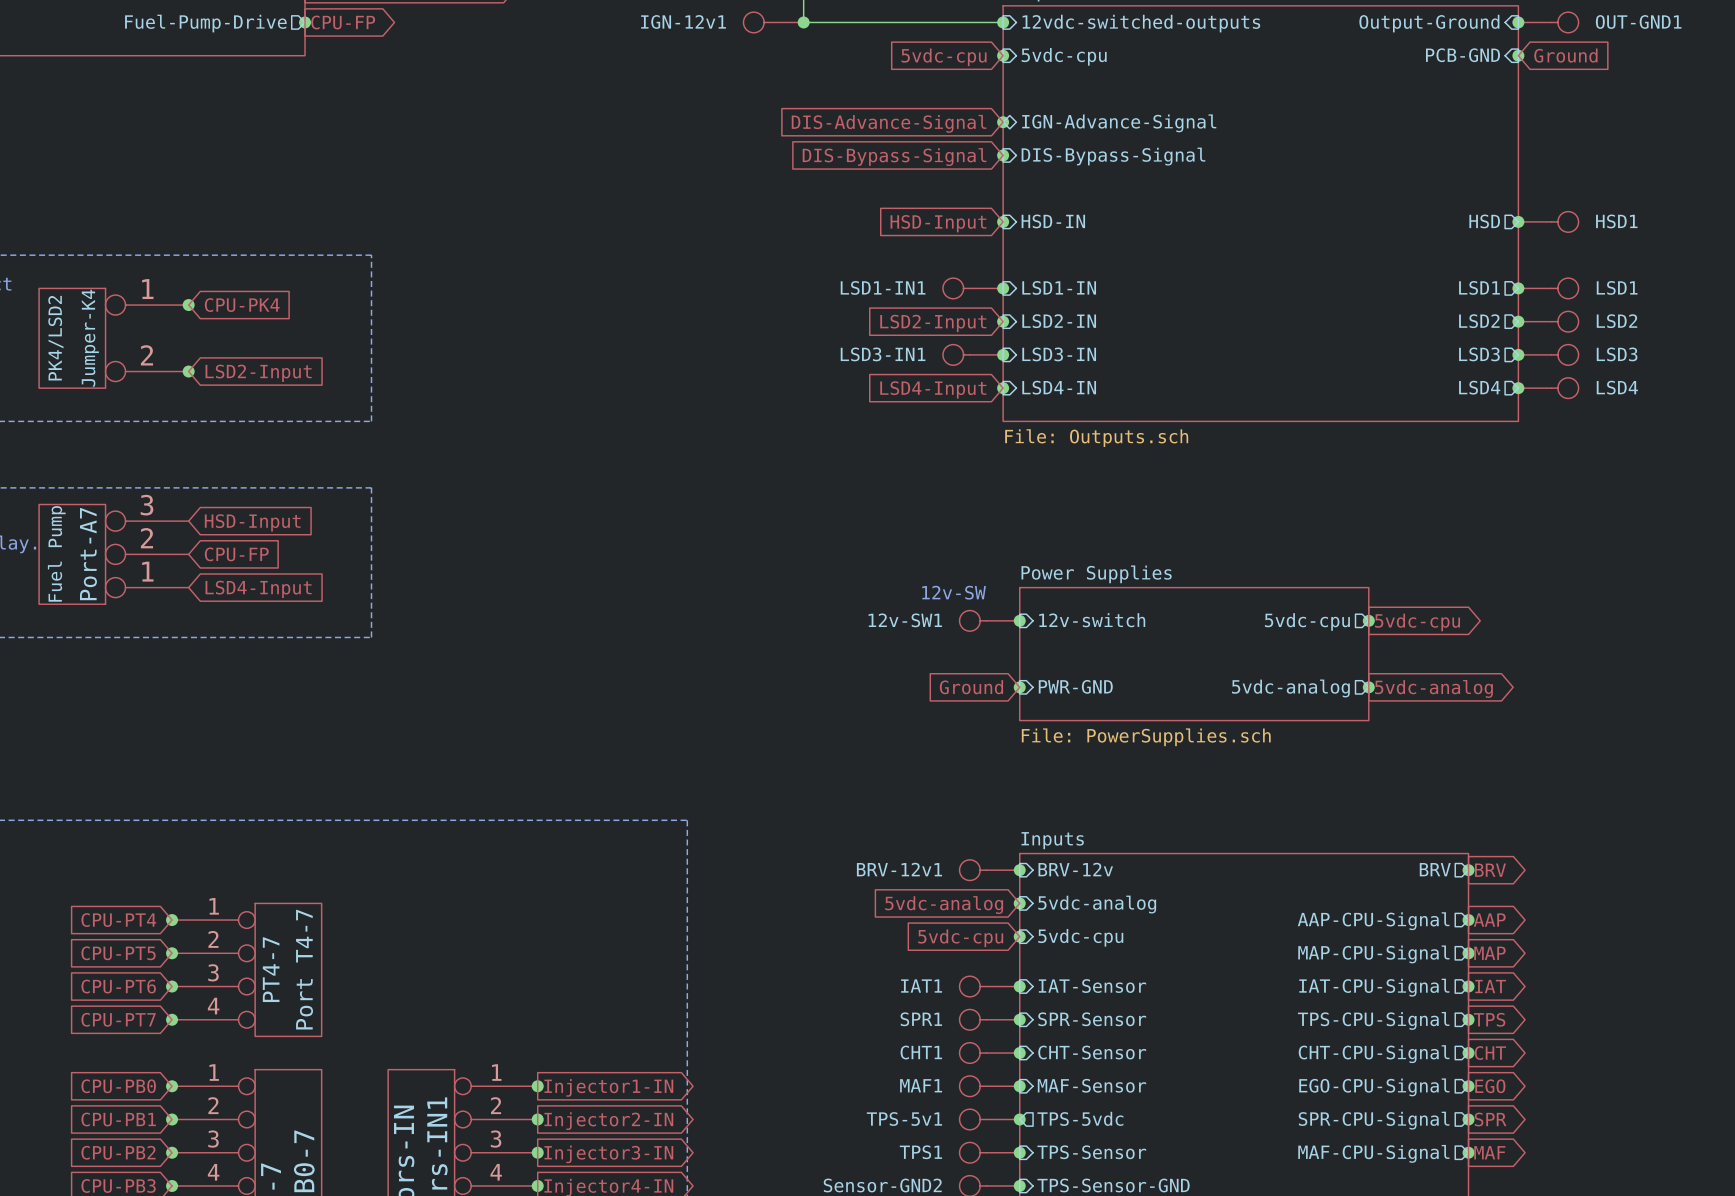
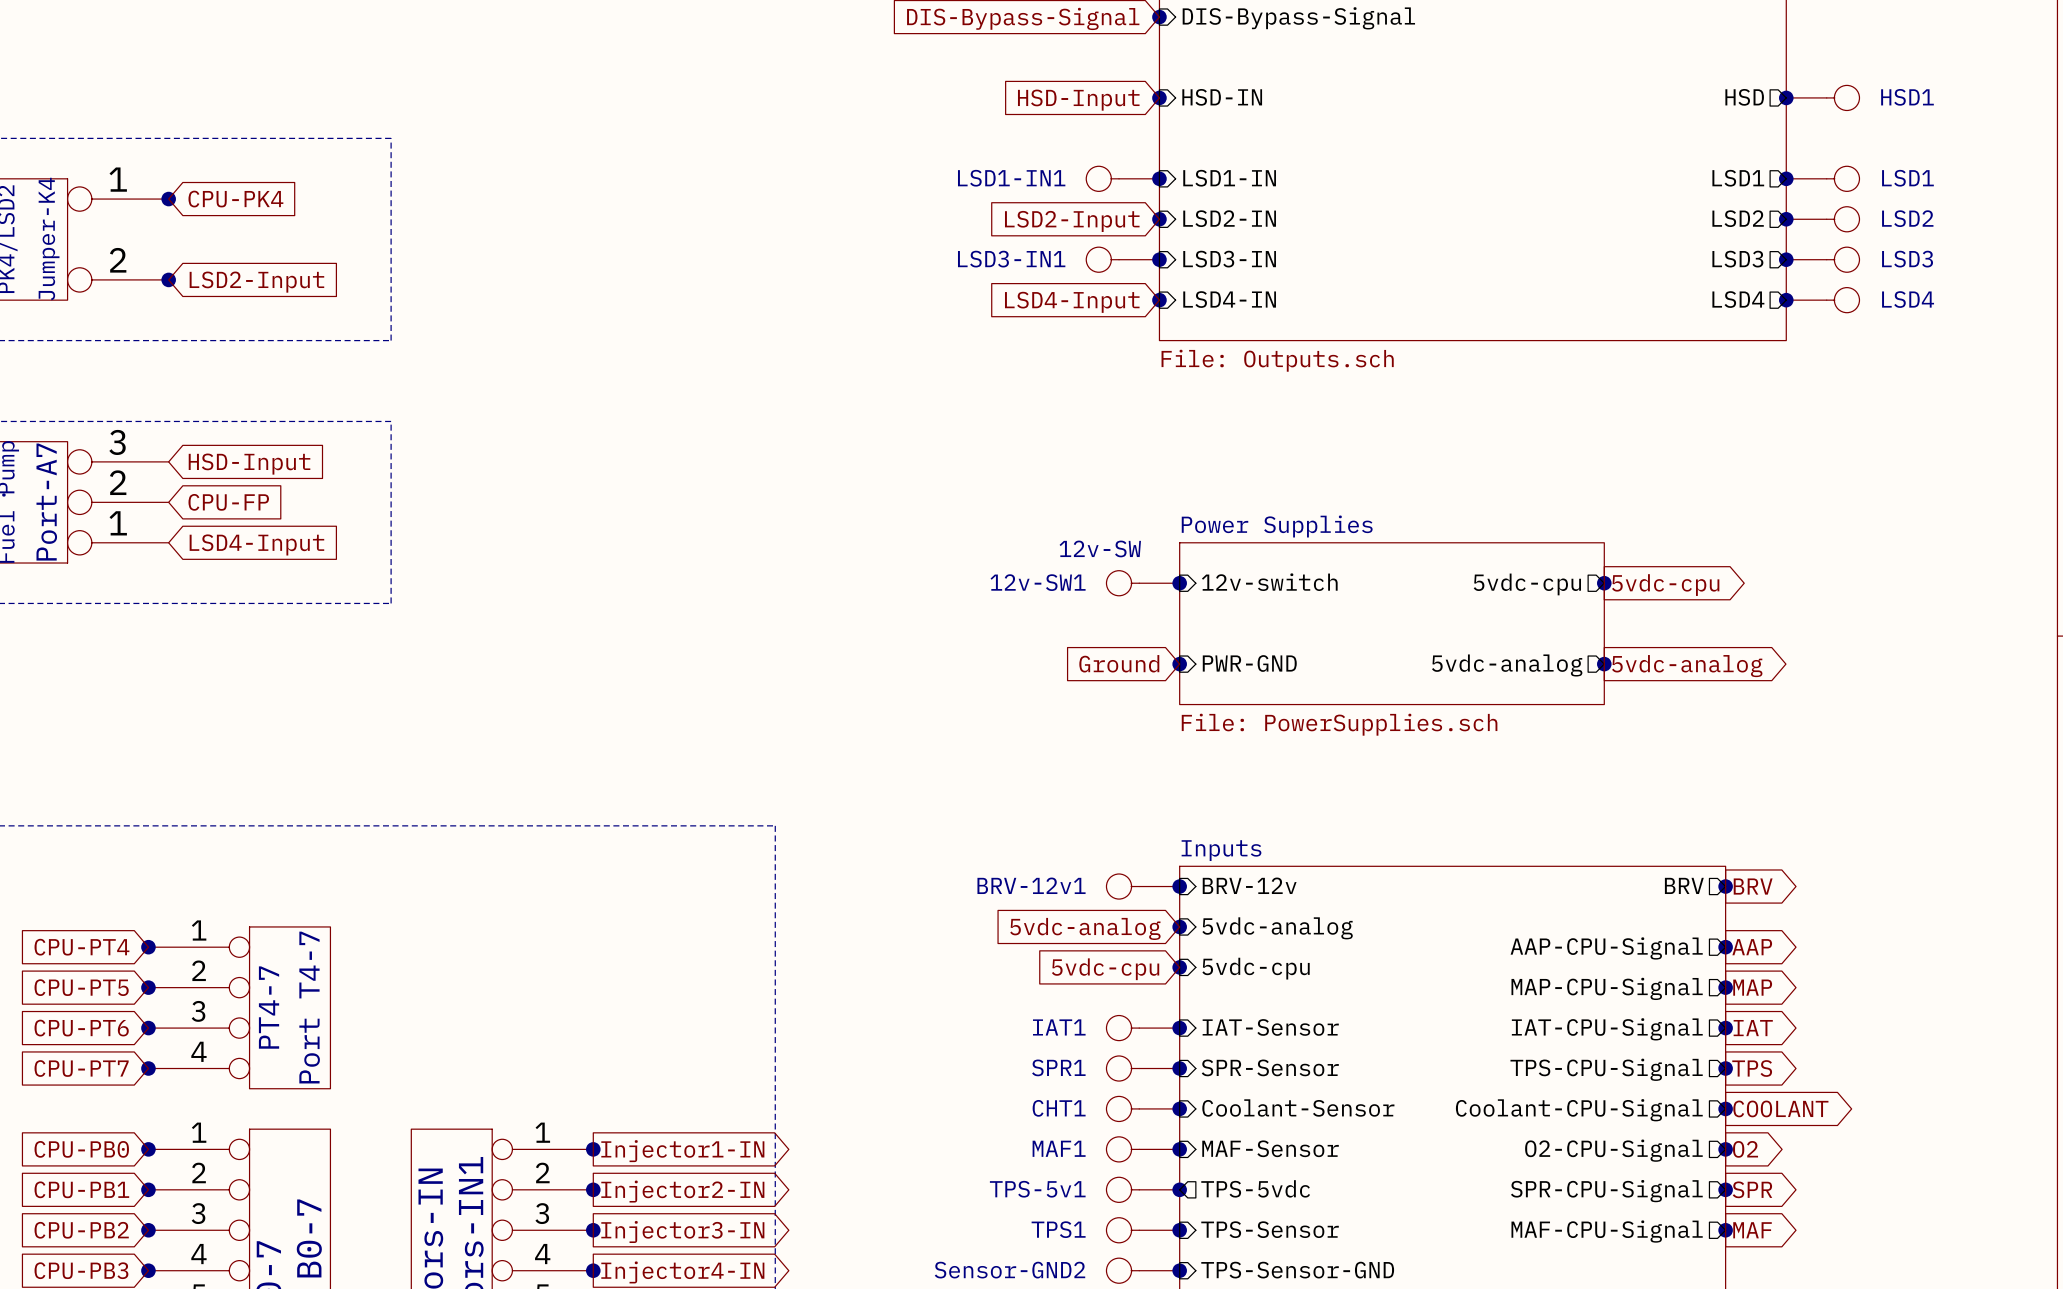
sheet pin: CHT-Sensor (1092, 1052) -> Coolant-Sensor (1298, 1107)
global label: CHT (1490, 1053) -> COOLANT (1780, 1108)
sheet pin: CHT-CPU-Signal (1374, 1054) -> Coolant-CPU-Signal (1579, 1110)
global label: EGO (1490, 1086) -> O2 (1745, 1149)
sheet pin: EGO-CPU-Signal (1374, 1087) -> O2-CPU-Signal (1613, 1150)

